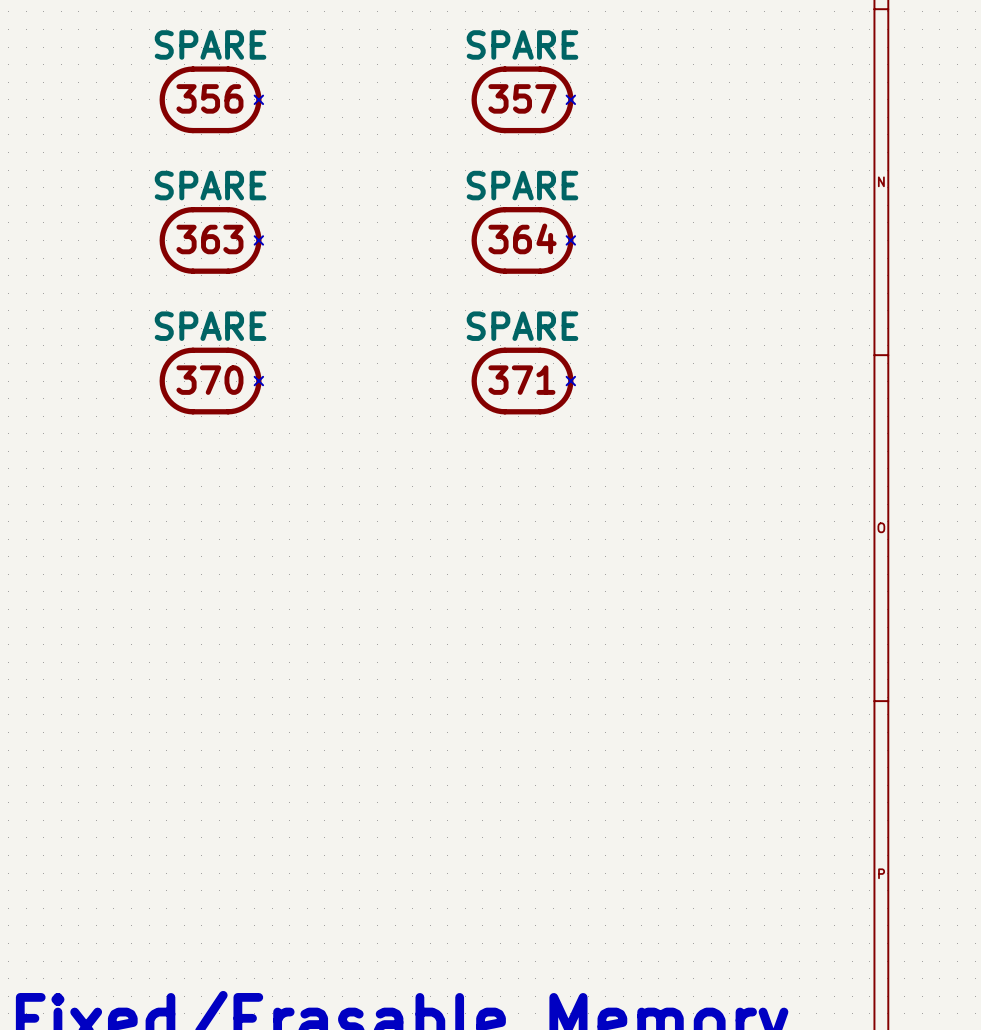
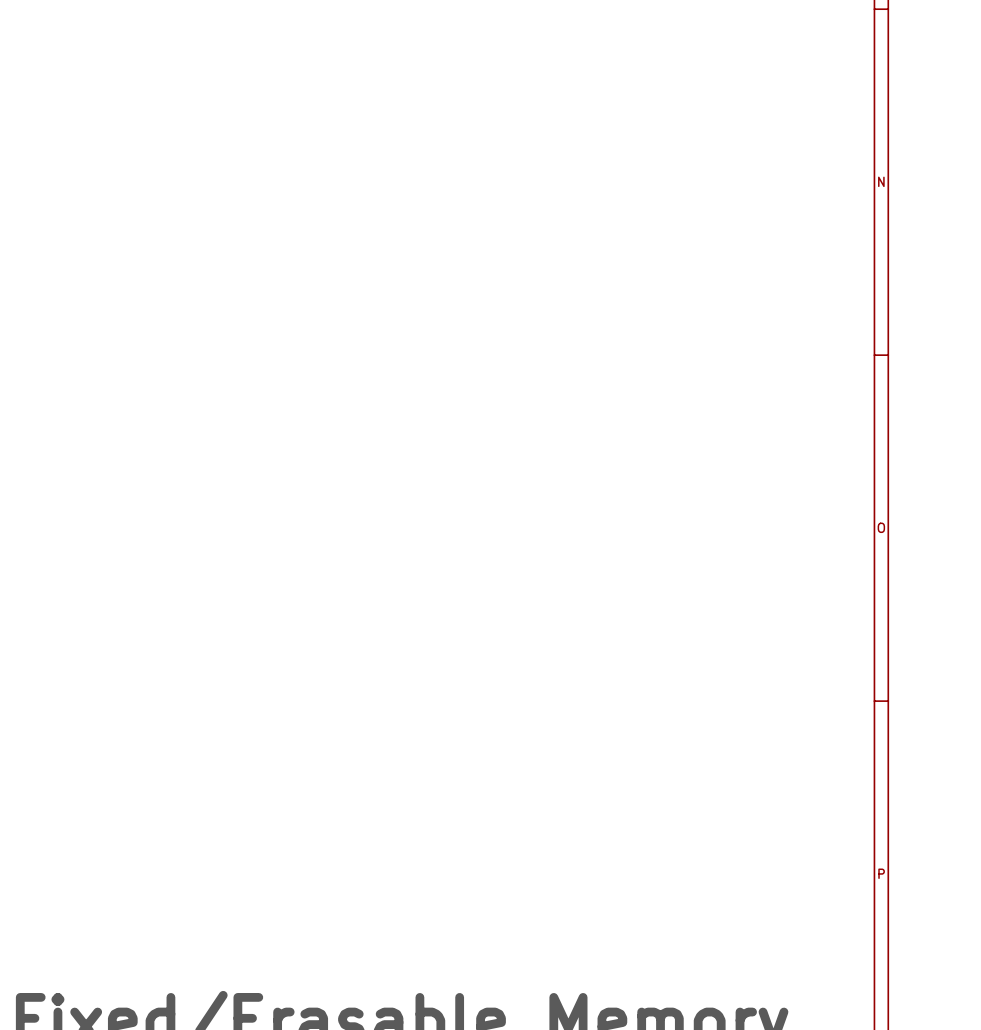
part: (210, 99) -> none
no-connect mark: (258, 99) -> none
part: (522, 99) -> none
no-connect mark: (570, 99) -> none
part: (210, 240) -> none
no-connect mark: (258, 240) -> none
part: (522, 240) -> none
no-connect mark: (570, 240) -> none
part: (210, 381) -> none
no-connect mark: (258, 381) -> none
part: (522, 381) -> none
no-connect mark: (570, 381) -> none

